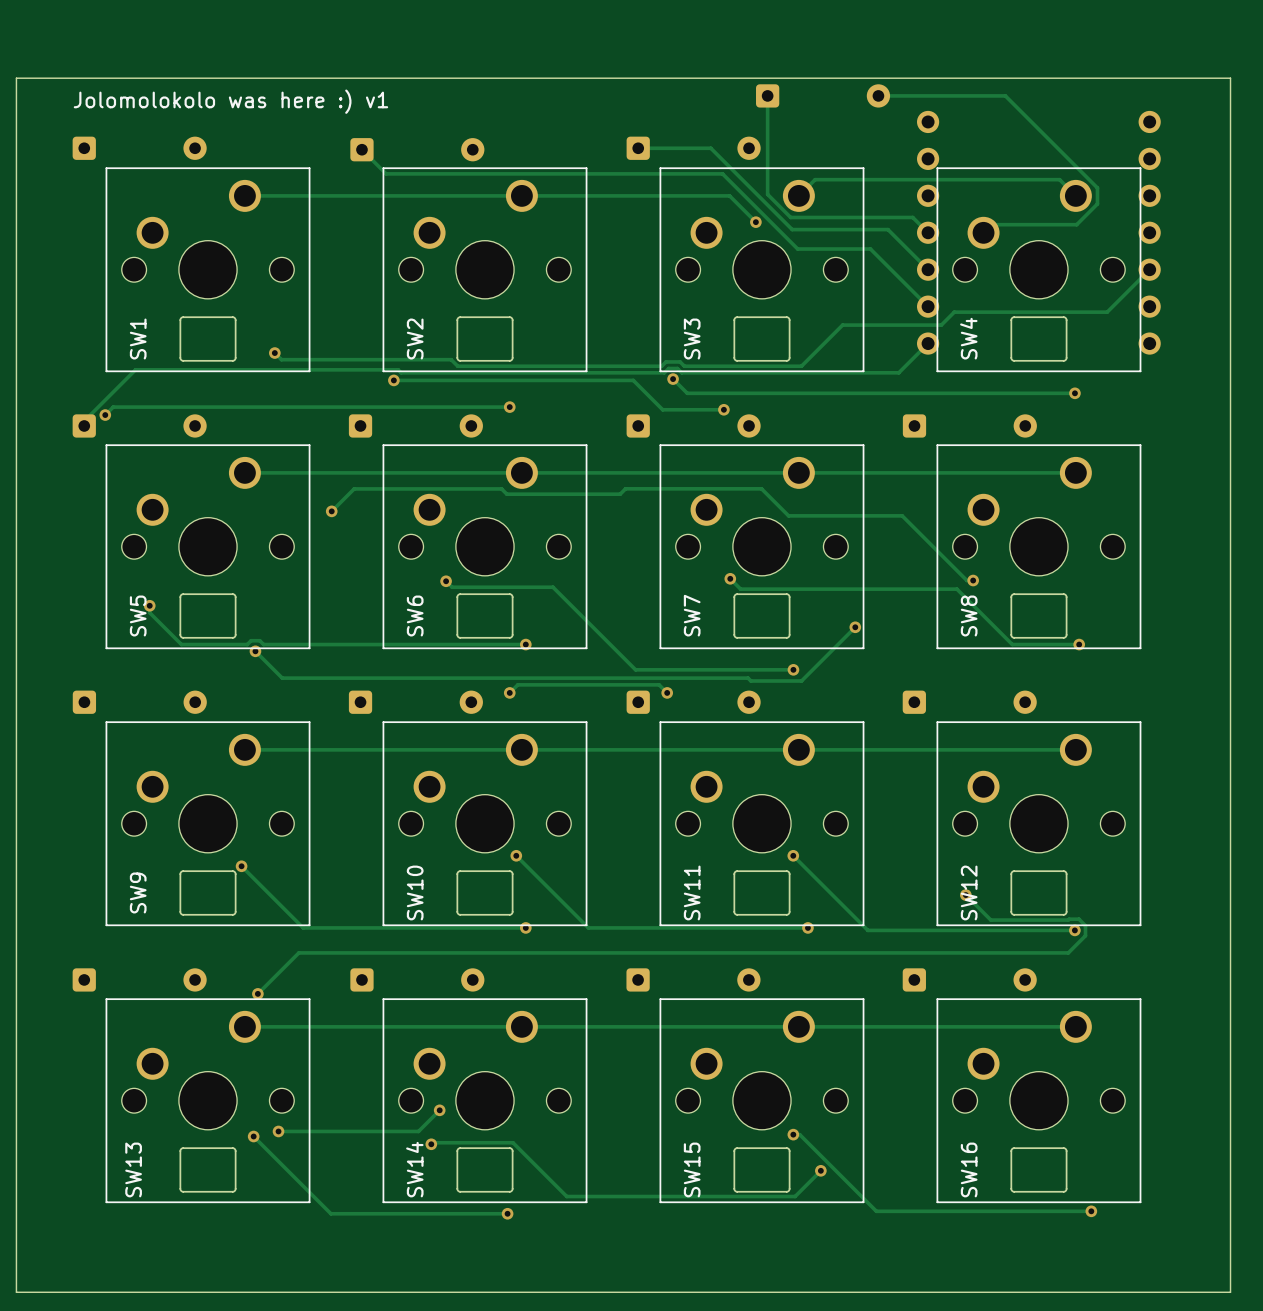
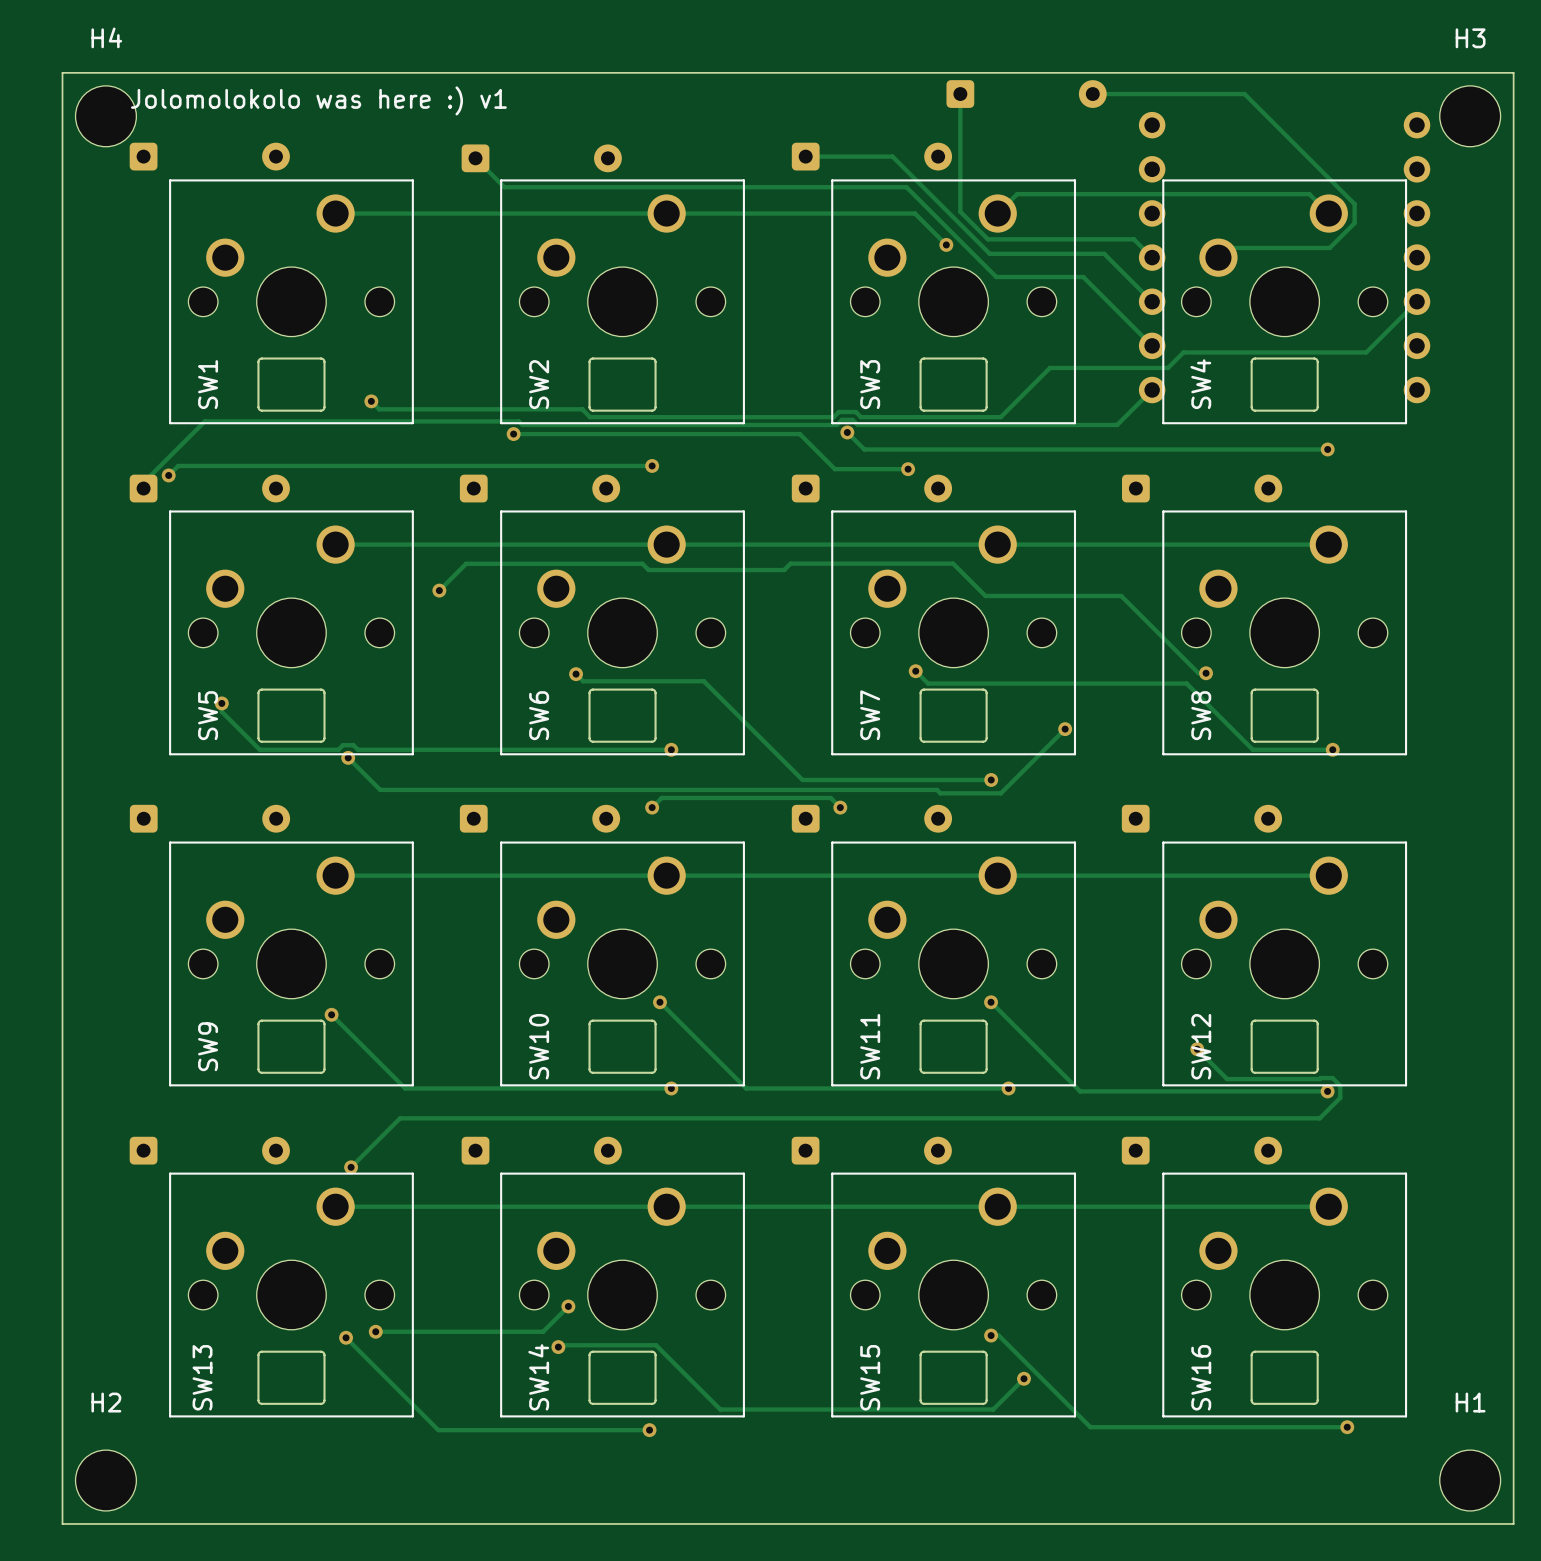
H4: none -> (105, 116)
H3: none -> (1470, 116)
H2: none -> (105, 1480)
H1: none -> (1470, 1480)

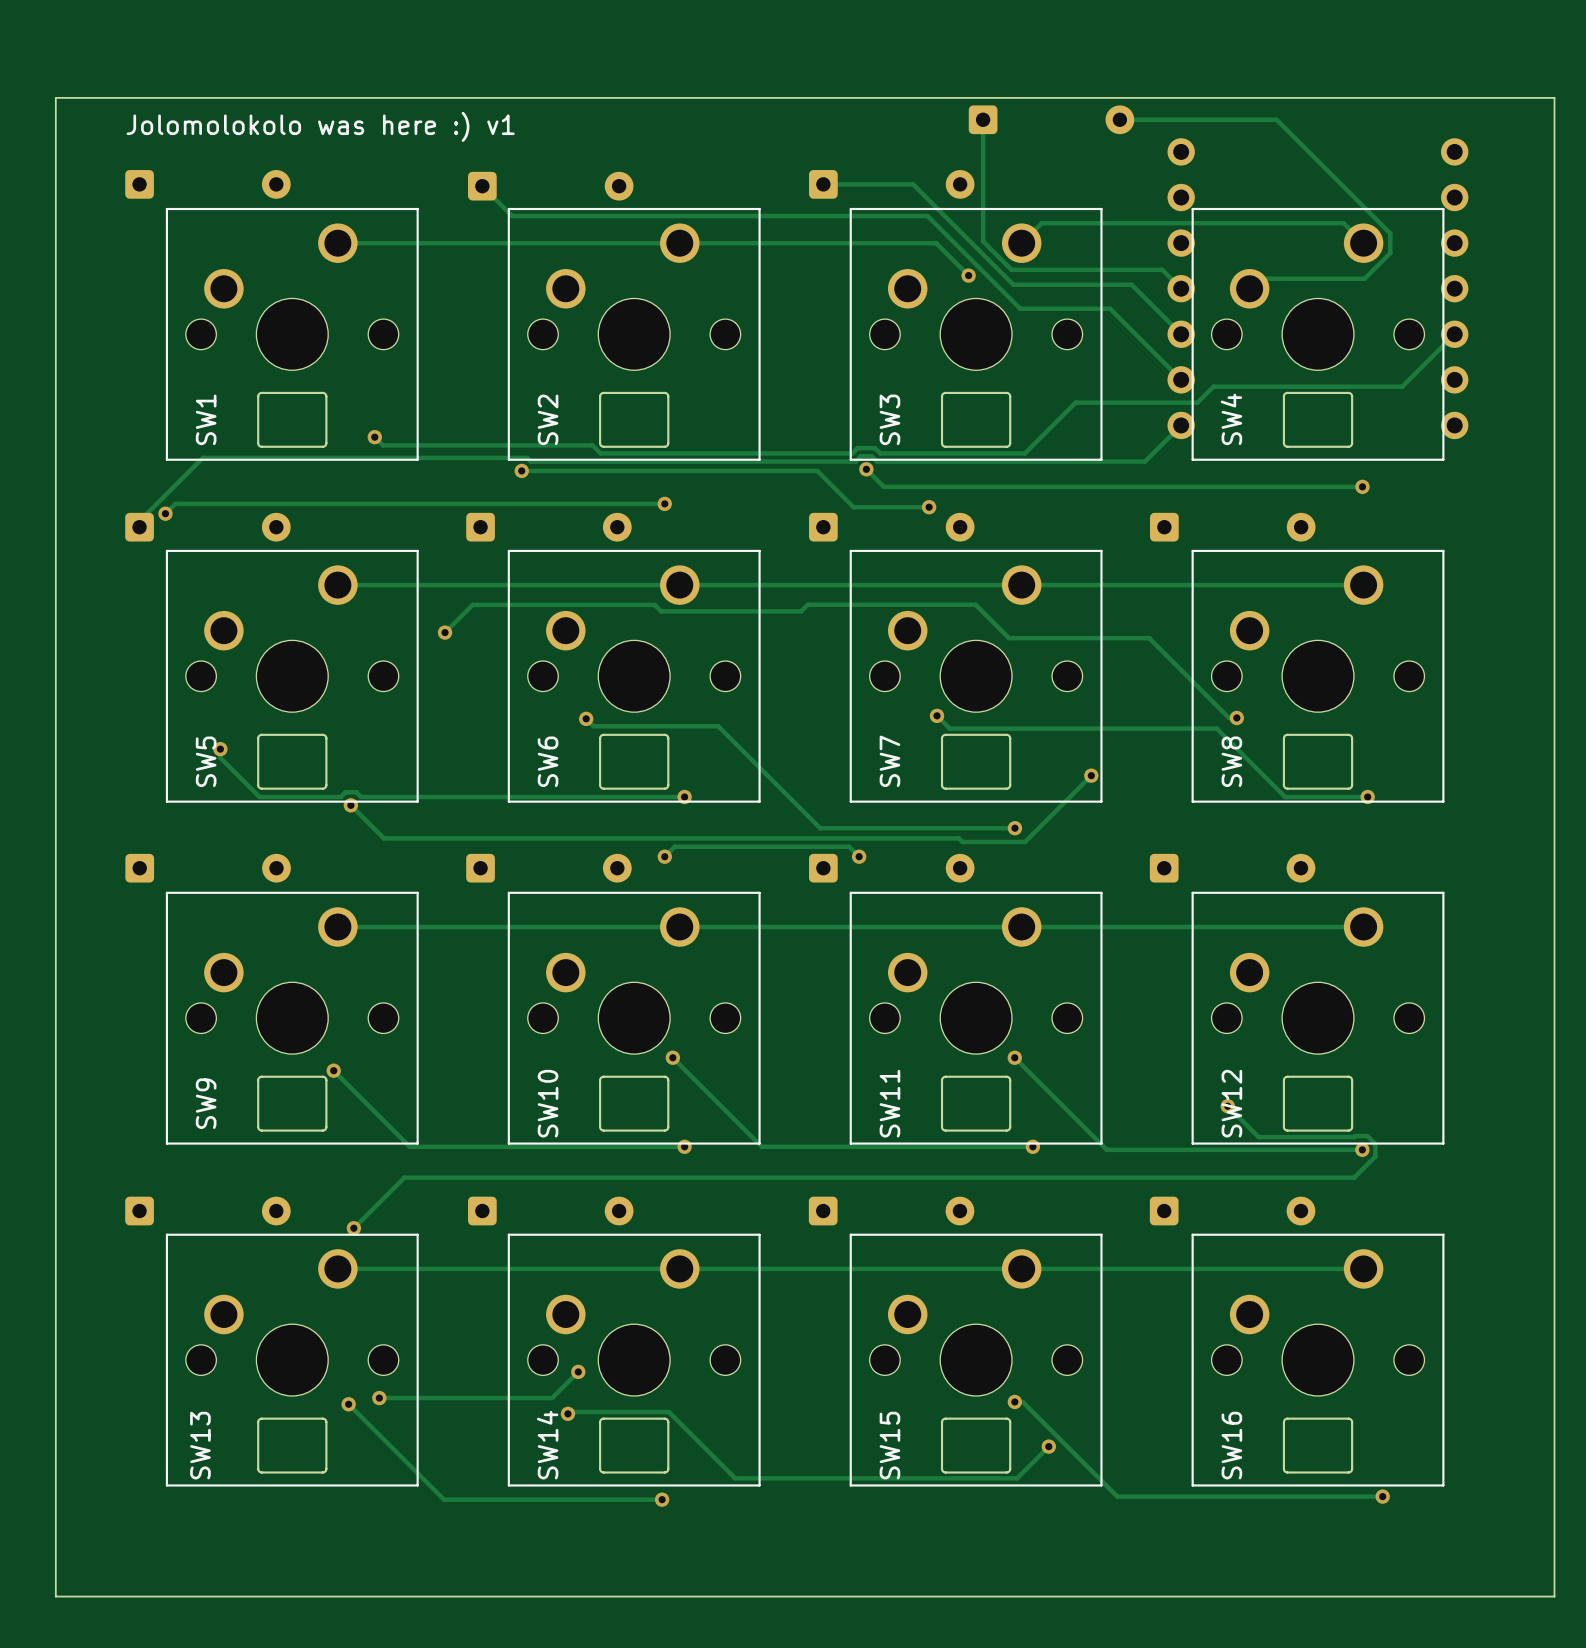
H4: (105, 116) -> none
H3: (1470, 116) -> none
H2: (105, 1480) -> none
H1: (1470, 1480) -> none

